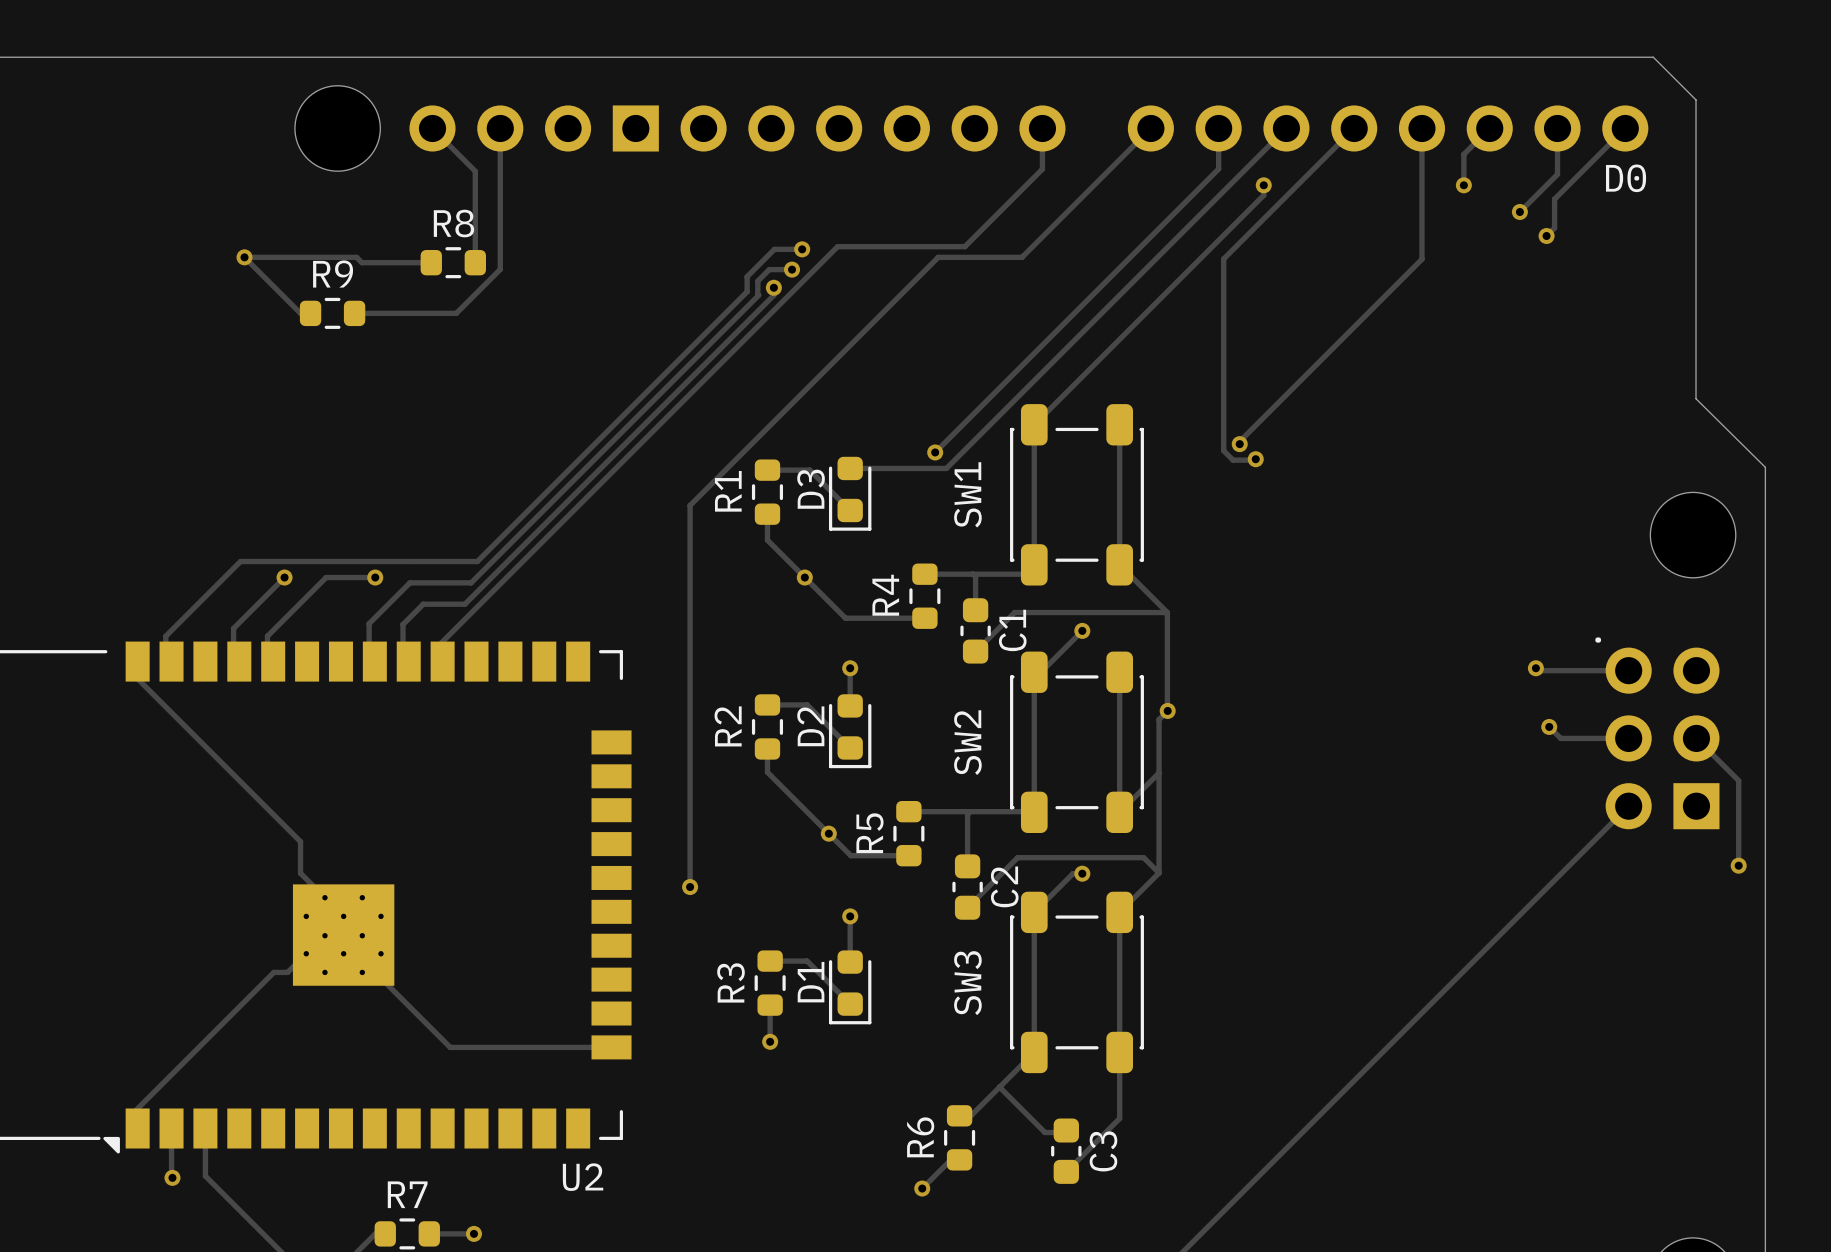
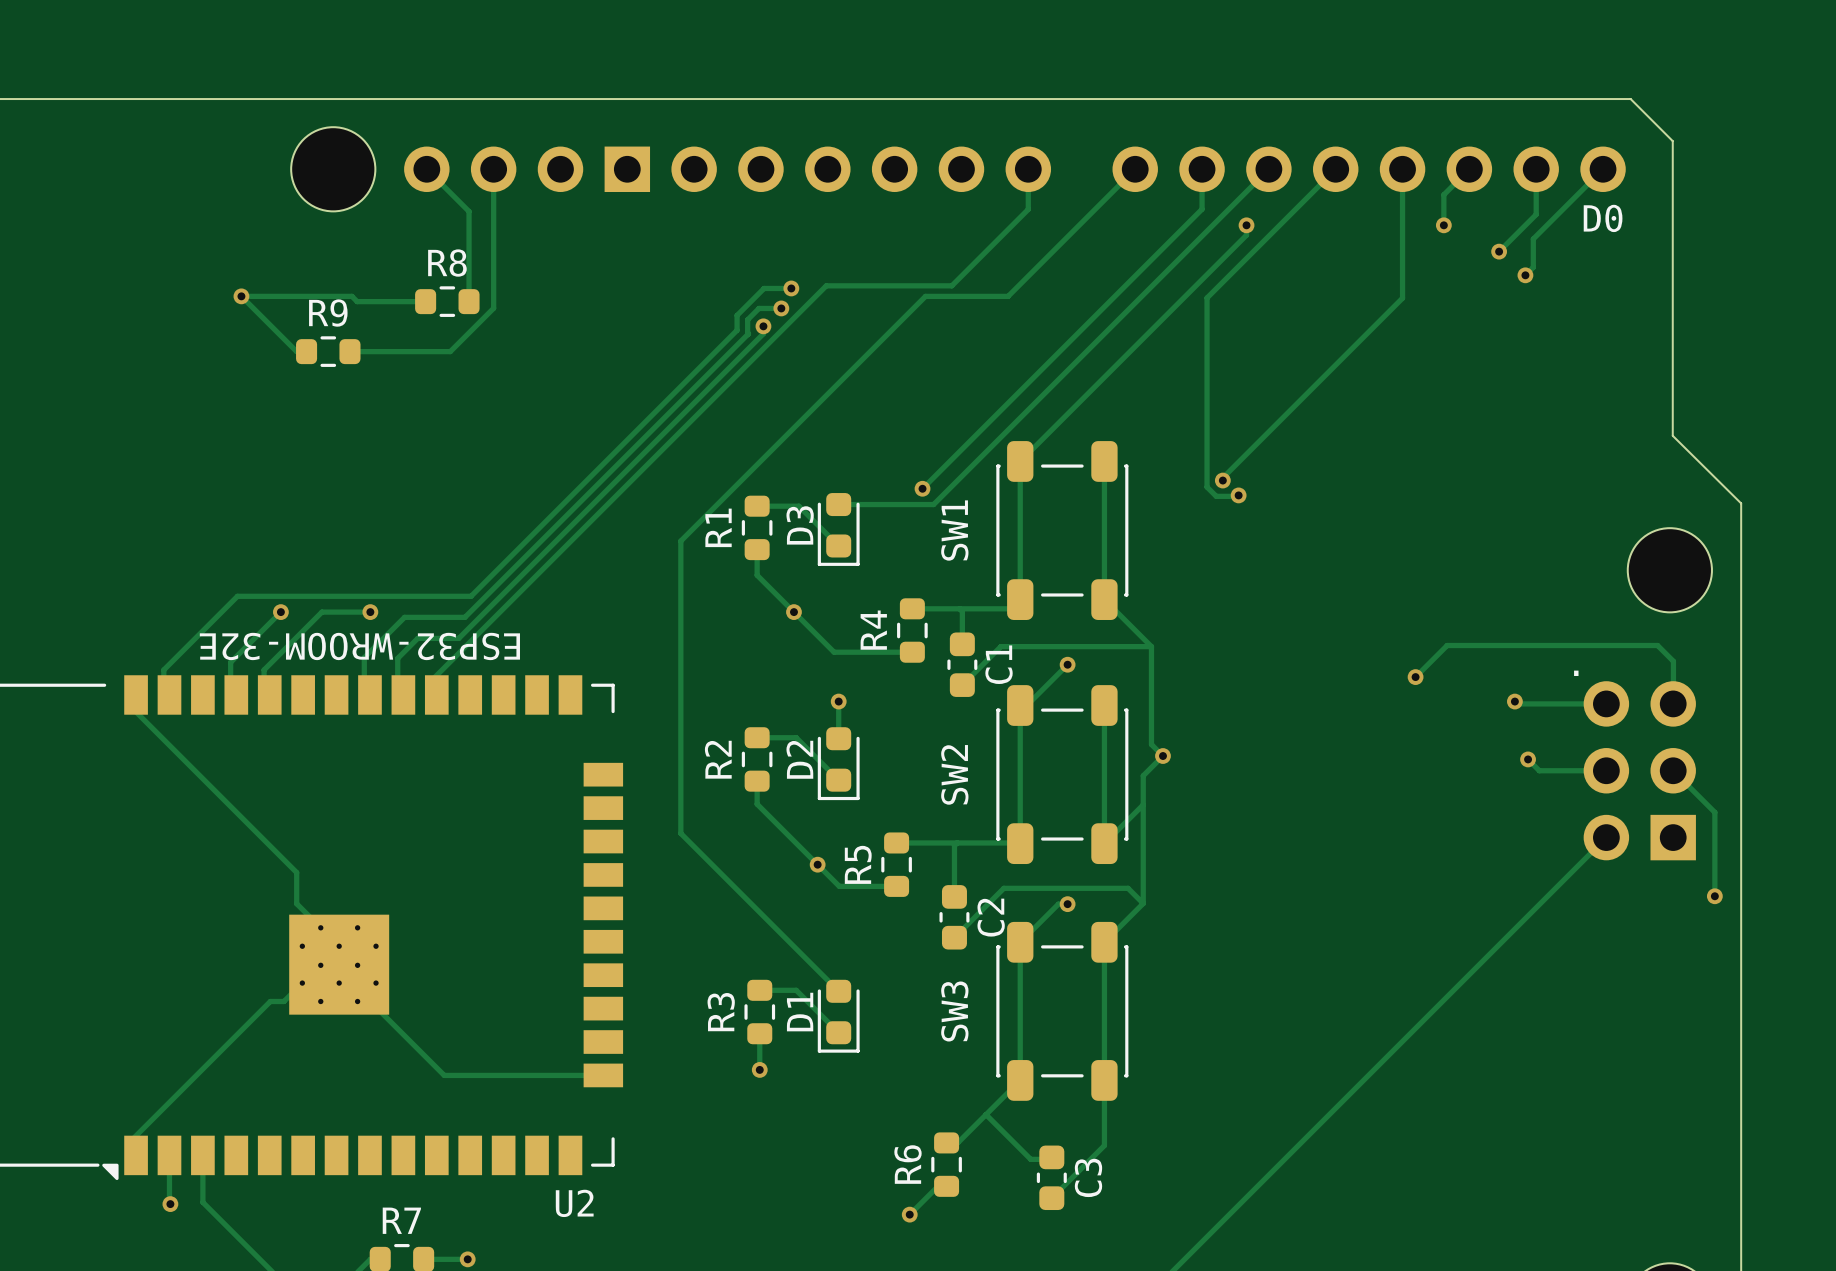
text: none -> ESP32-WROOM-32E (359, 646)
track: none -> (1415, 677) (1447, 645) (1657, 645) (1673, 661) (1673, 703)
via: none -> (1415, 677)
track: (1167, 710) (1159, 719) (1159, 743) -> (1151, 743) (1162, 756) (1143, 775)
via position: (1167, 710) -> (1162, 756)
track: (690, 801) (690, 887) -> (680, 833) (838, 991)
via: (690, 887) -> none
track: (850, 916) (850, 962) -> none
via: (850, 916) -> none

